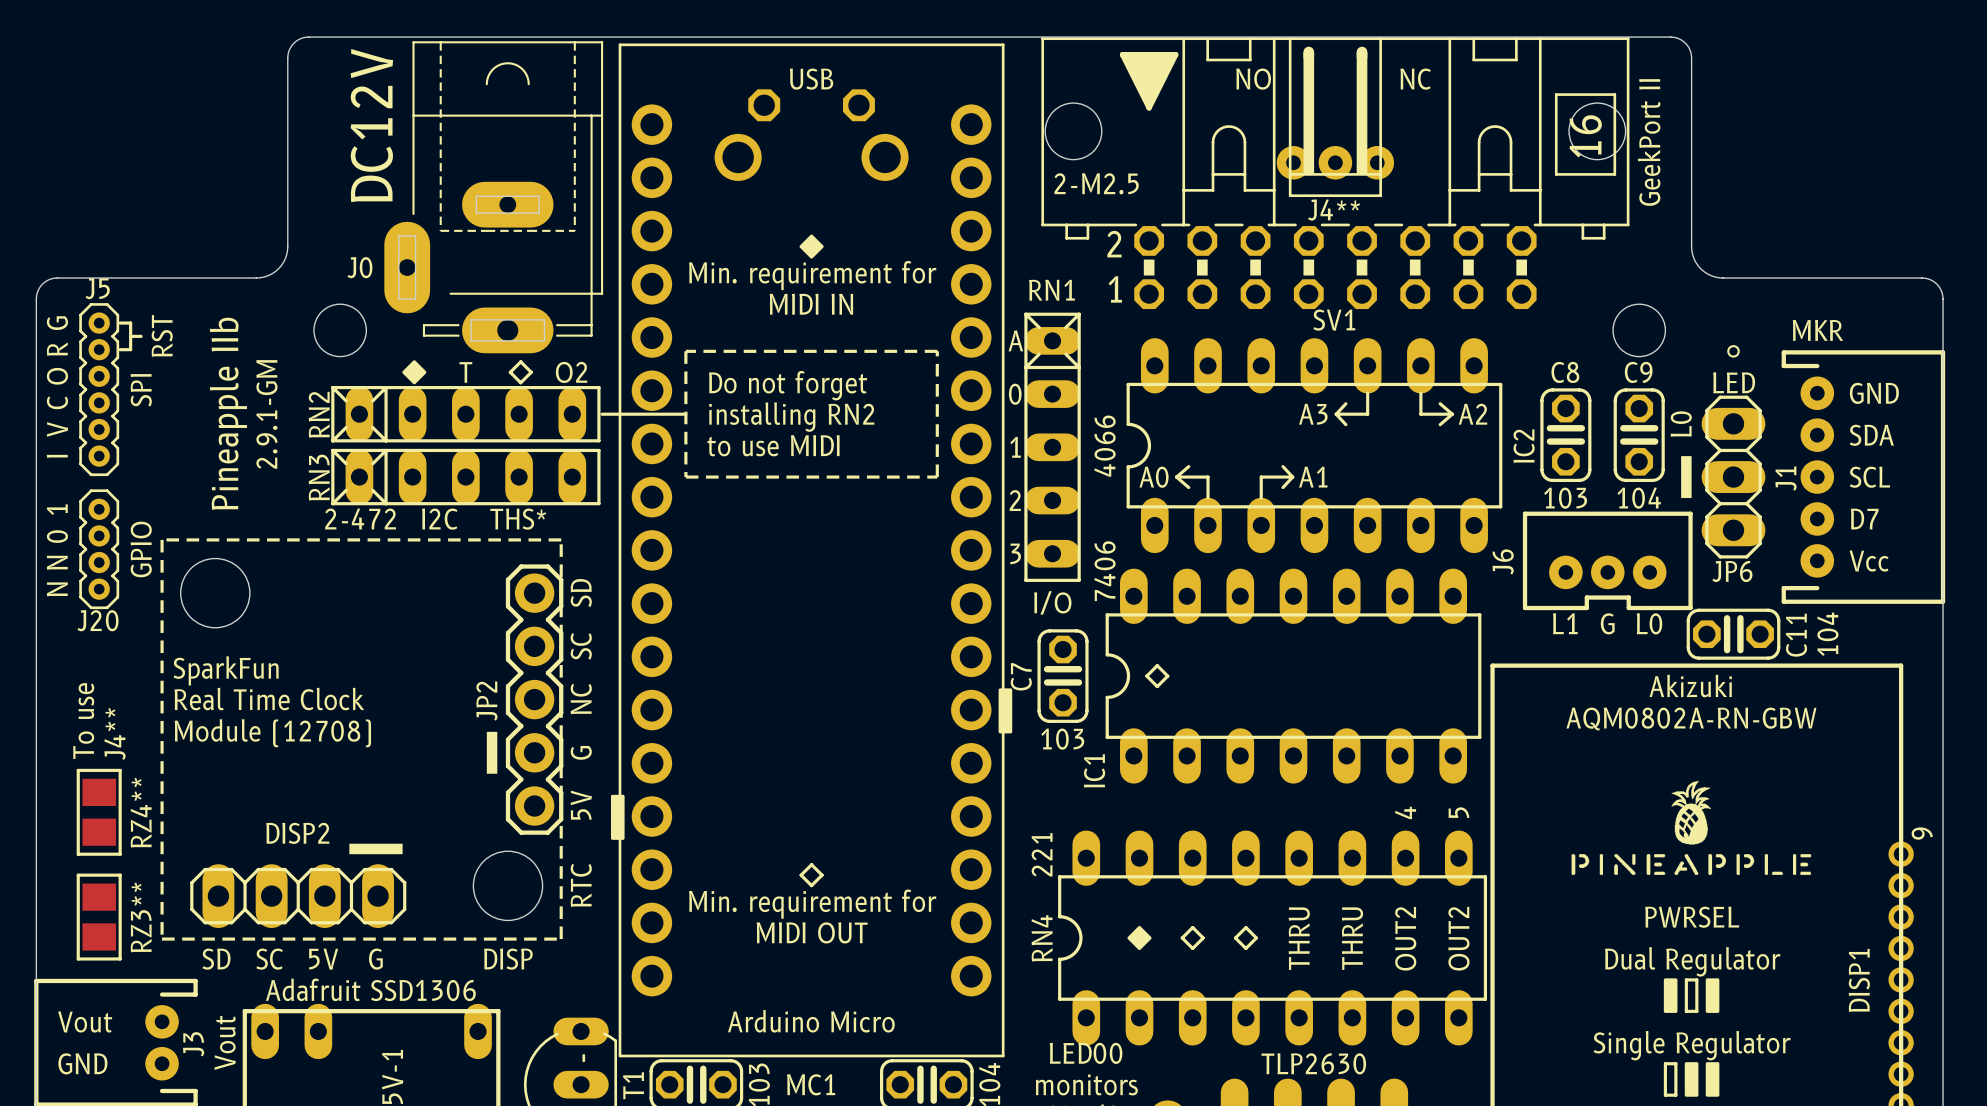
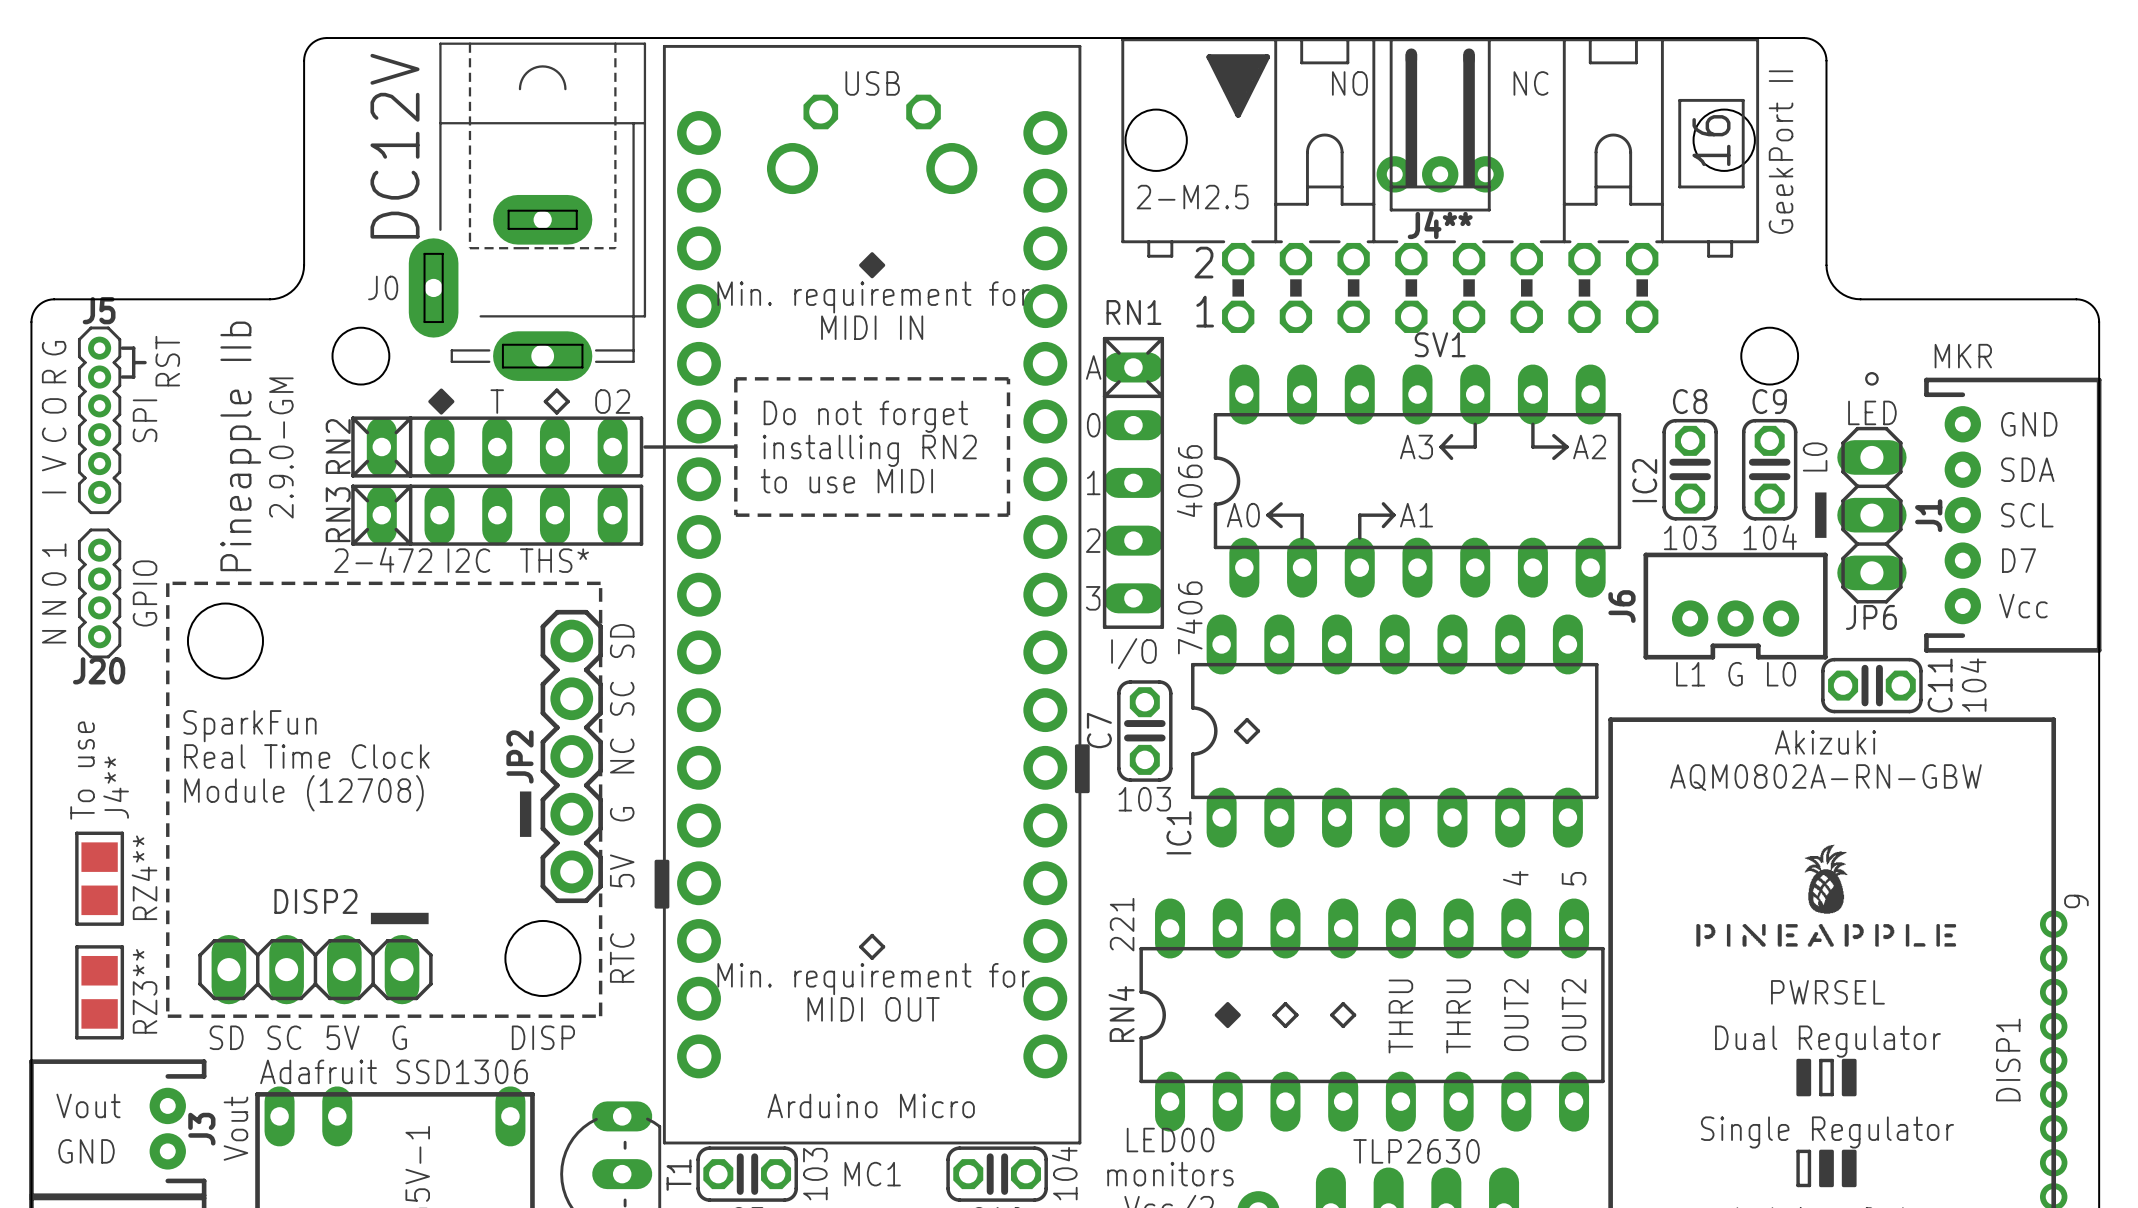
text: 2.9.1-GM (266, 414) -> 2.9.0-GM (281, 447)

